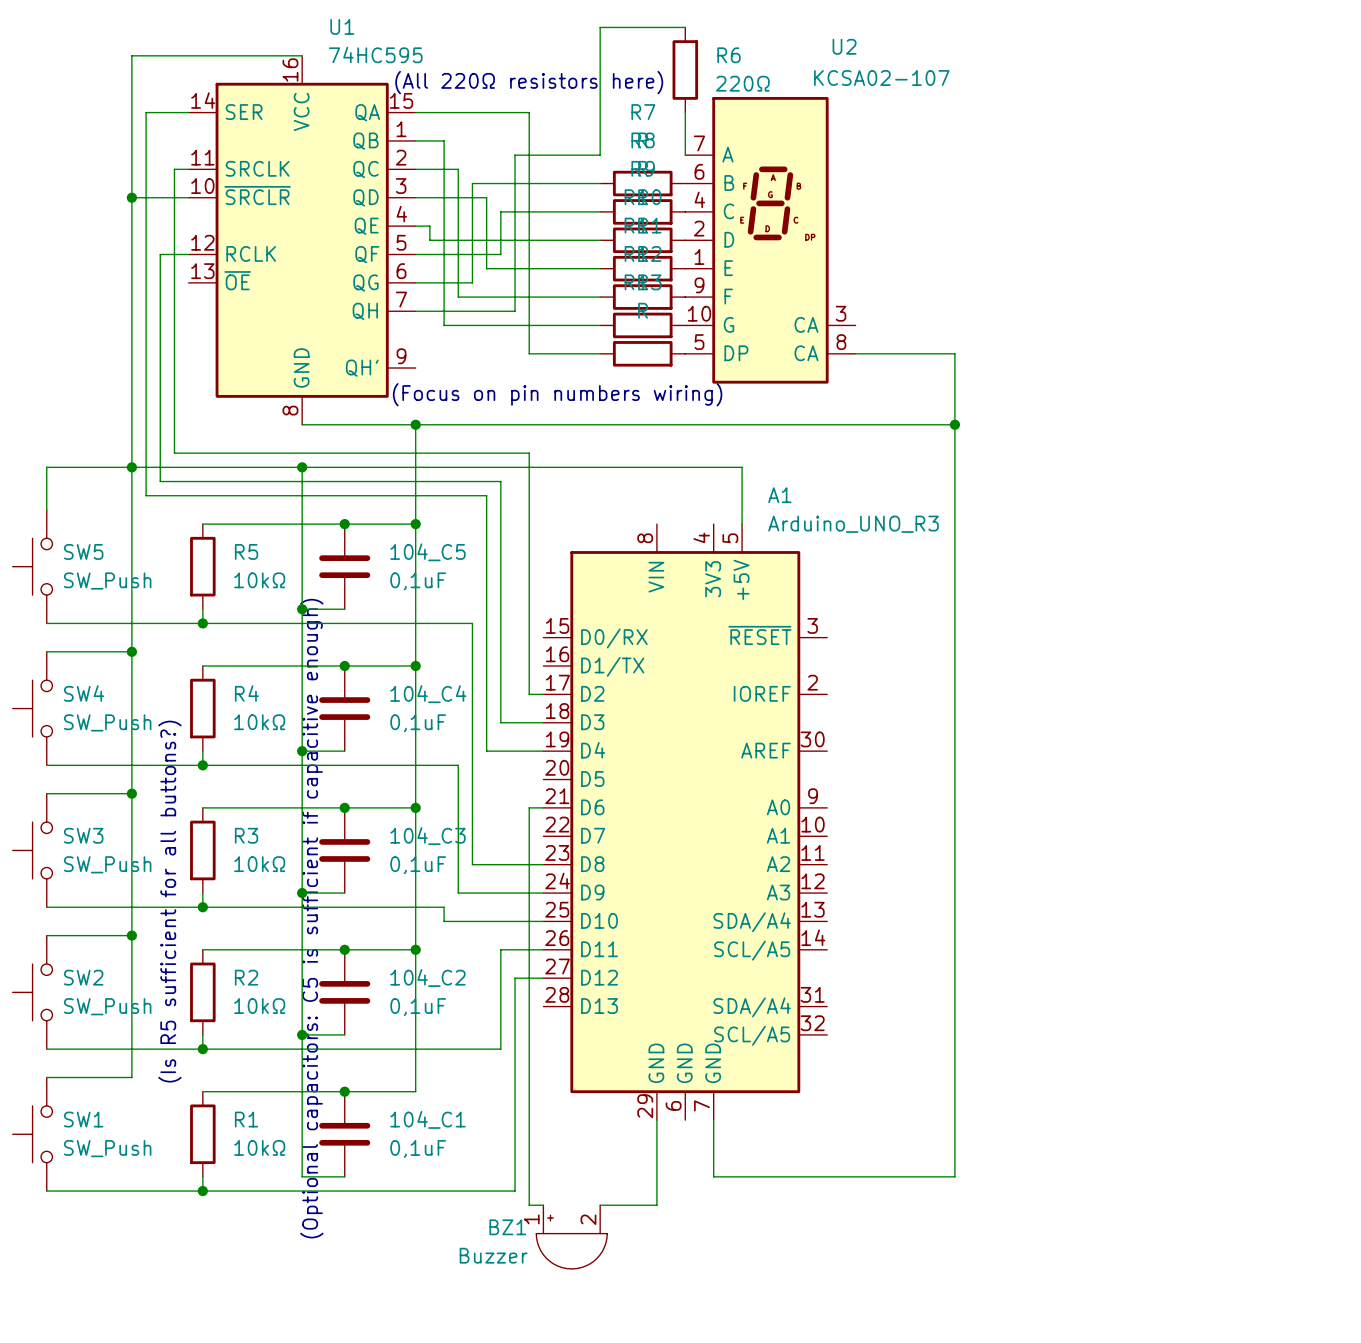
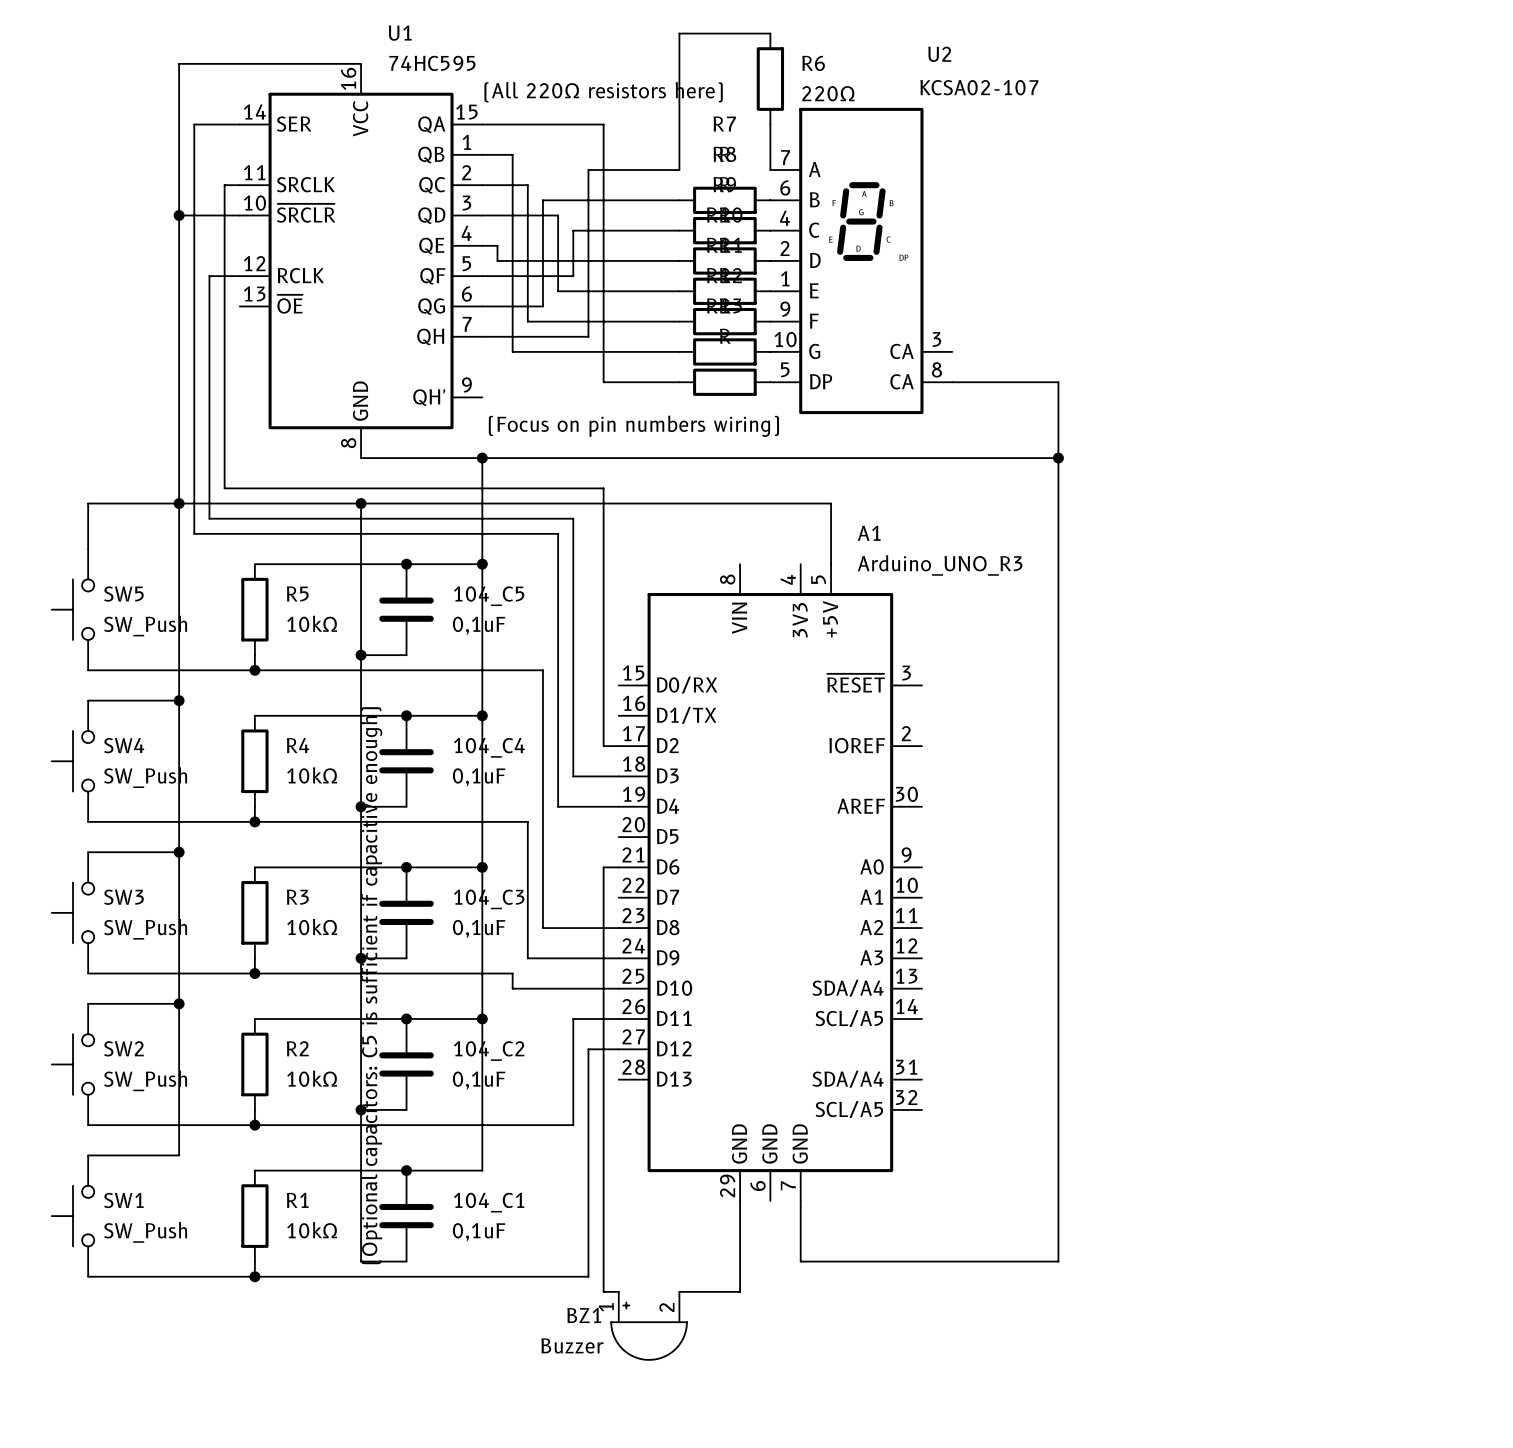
text: (Is R5 sufficient for all buttons?) (169, 901) -> none

